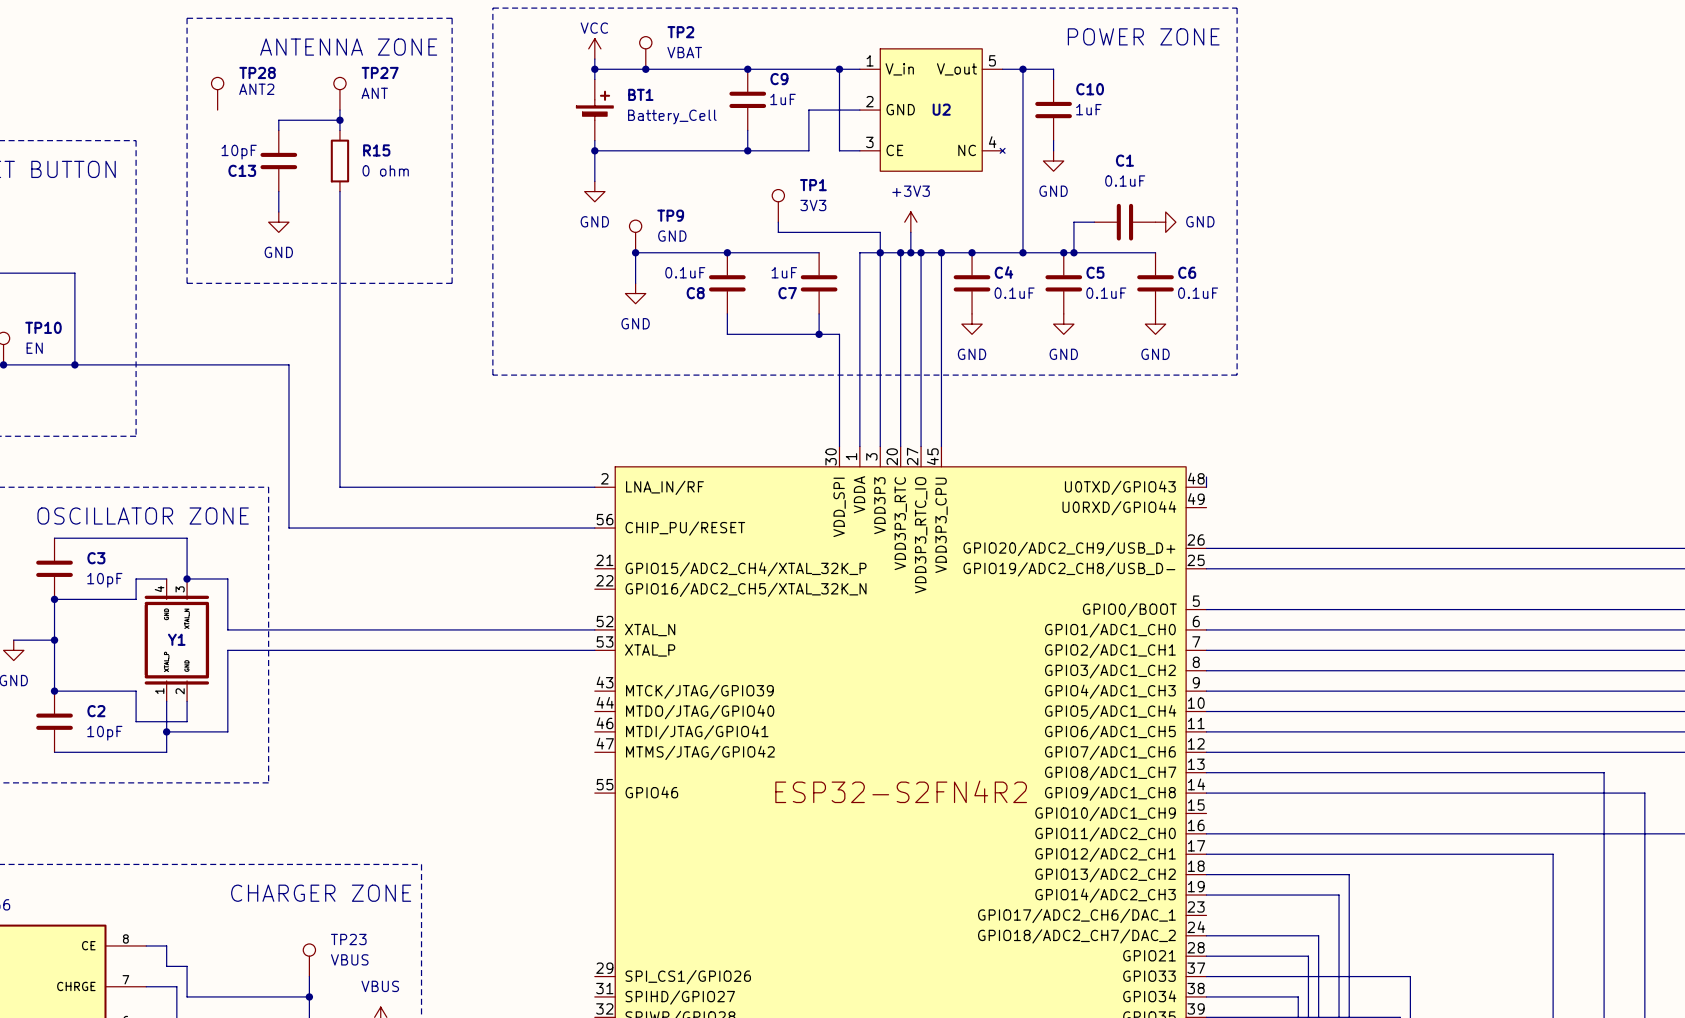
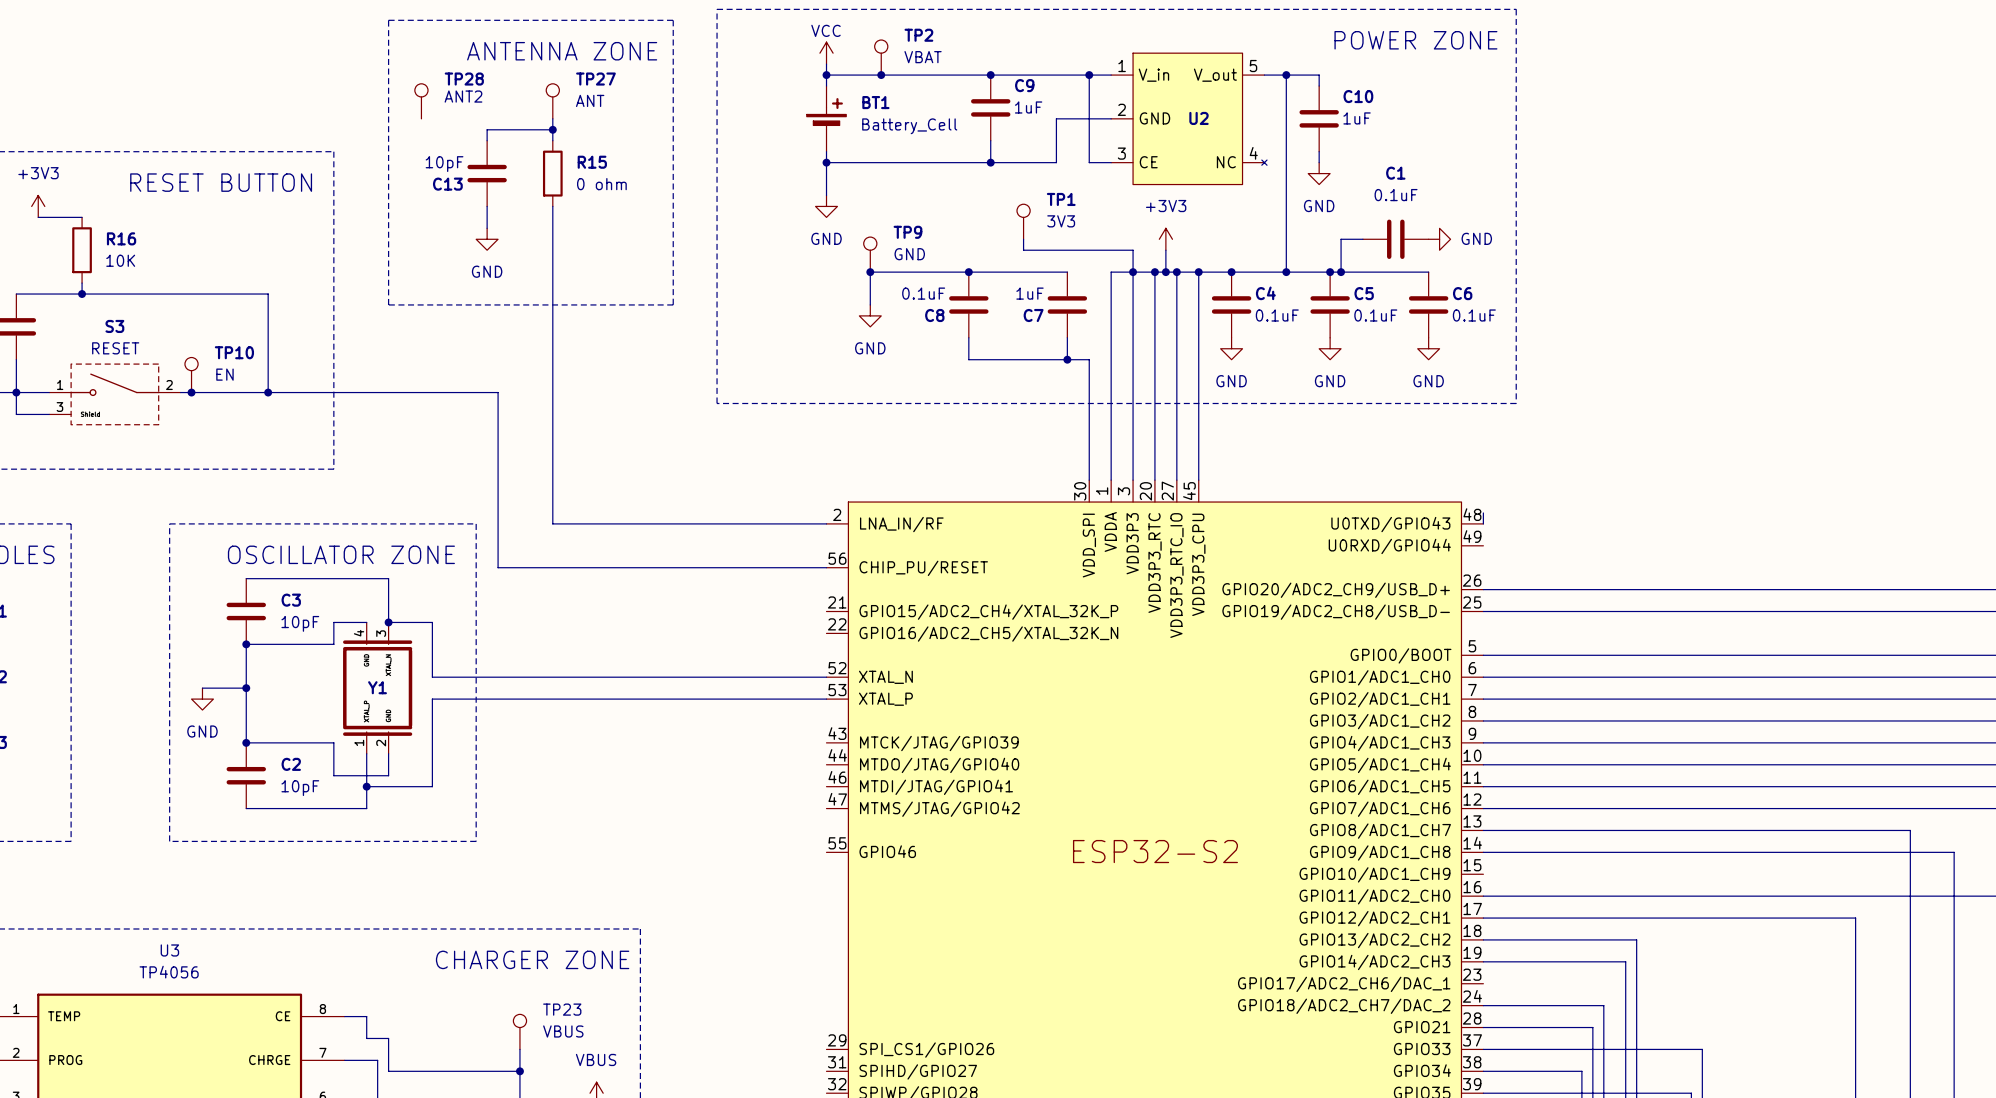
part text: ESP32-S2FN4R2 (901, 791) -> ESP32-S2 (1155, 851)

